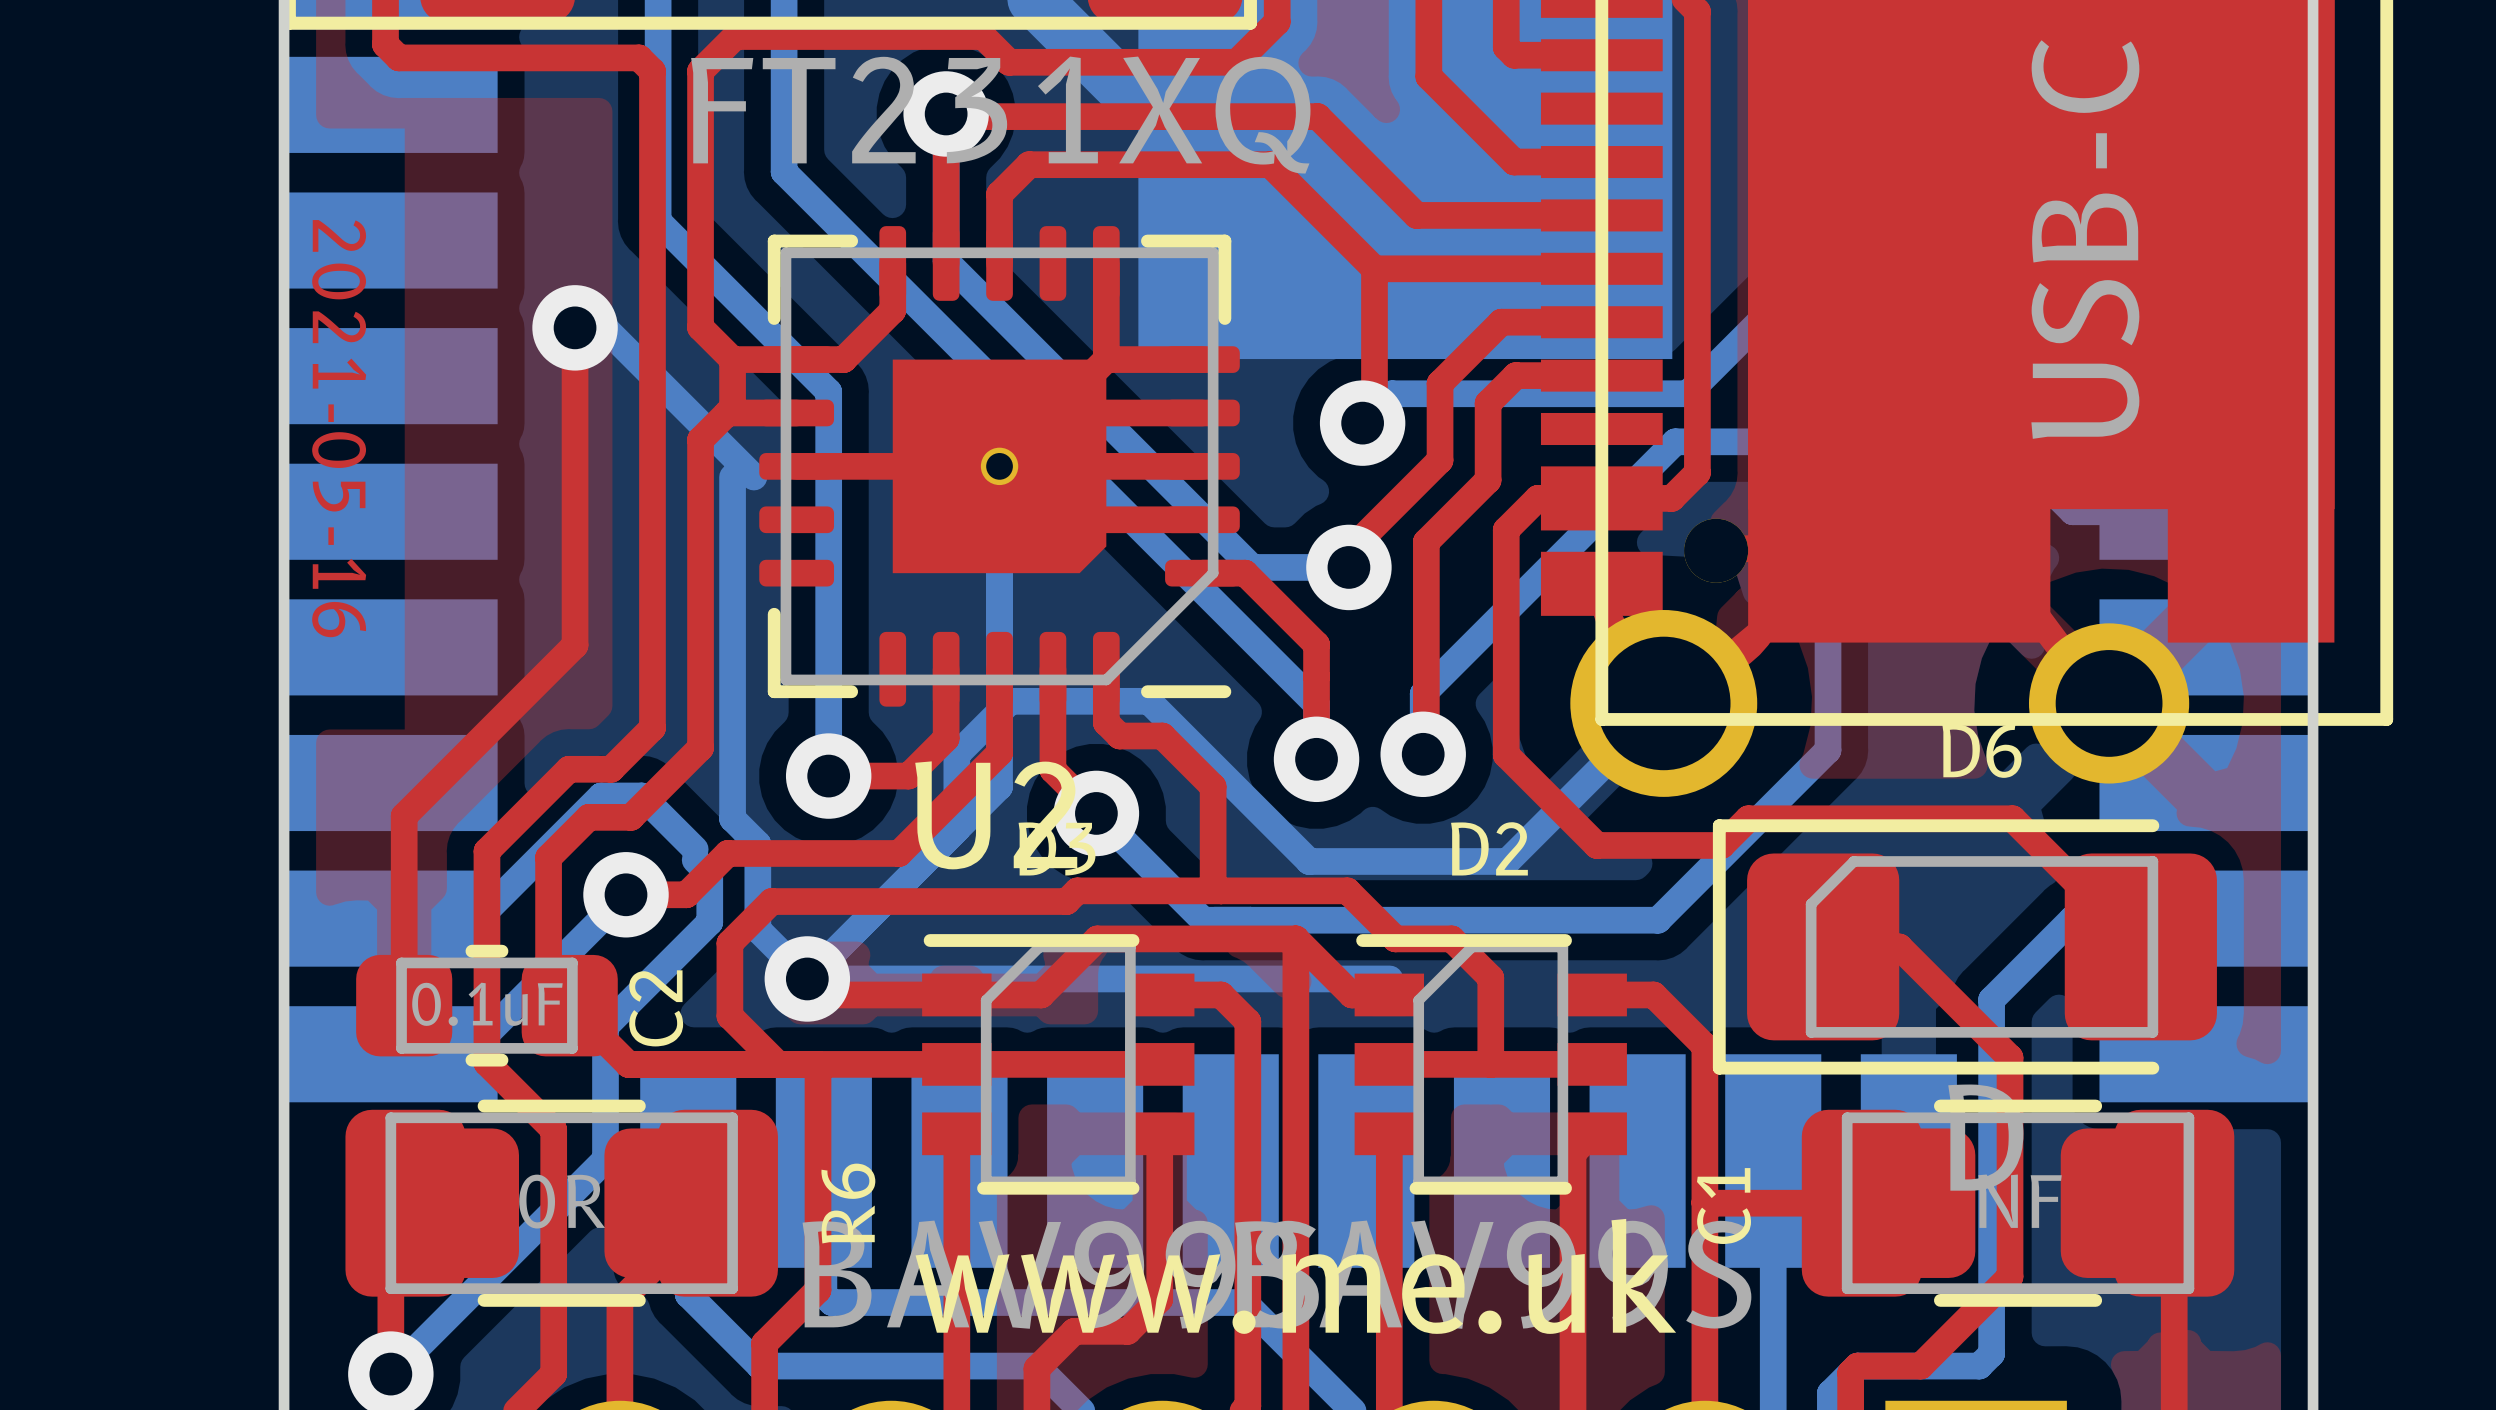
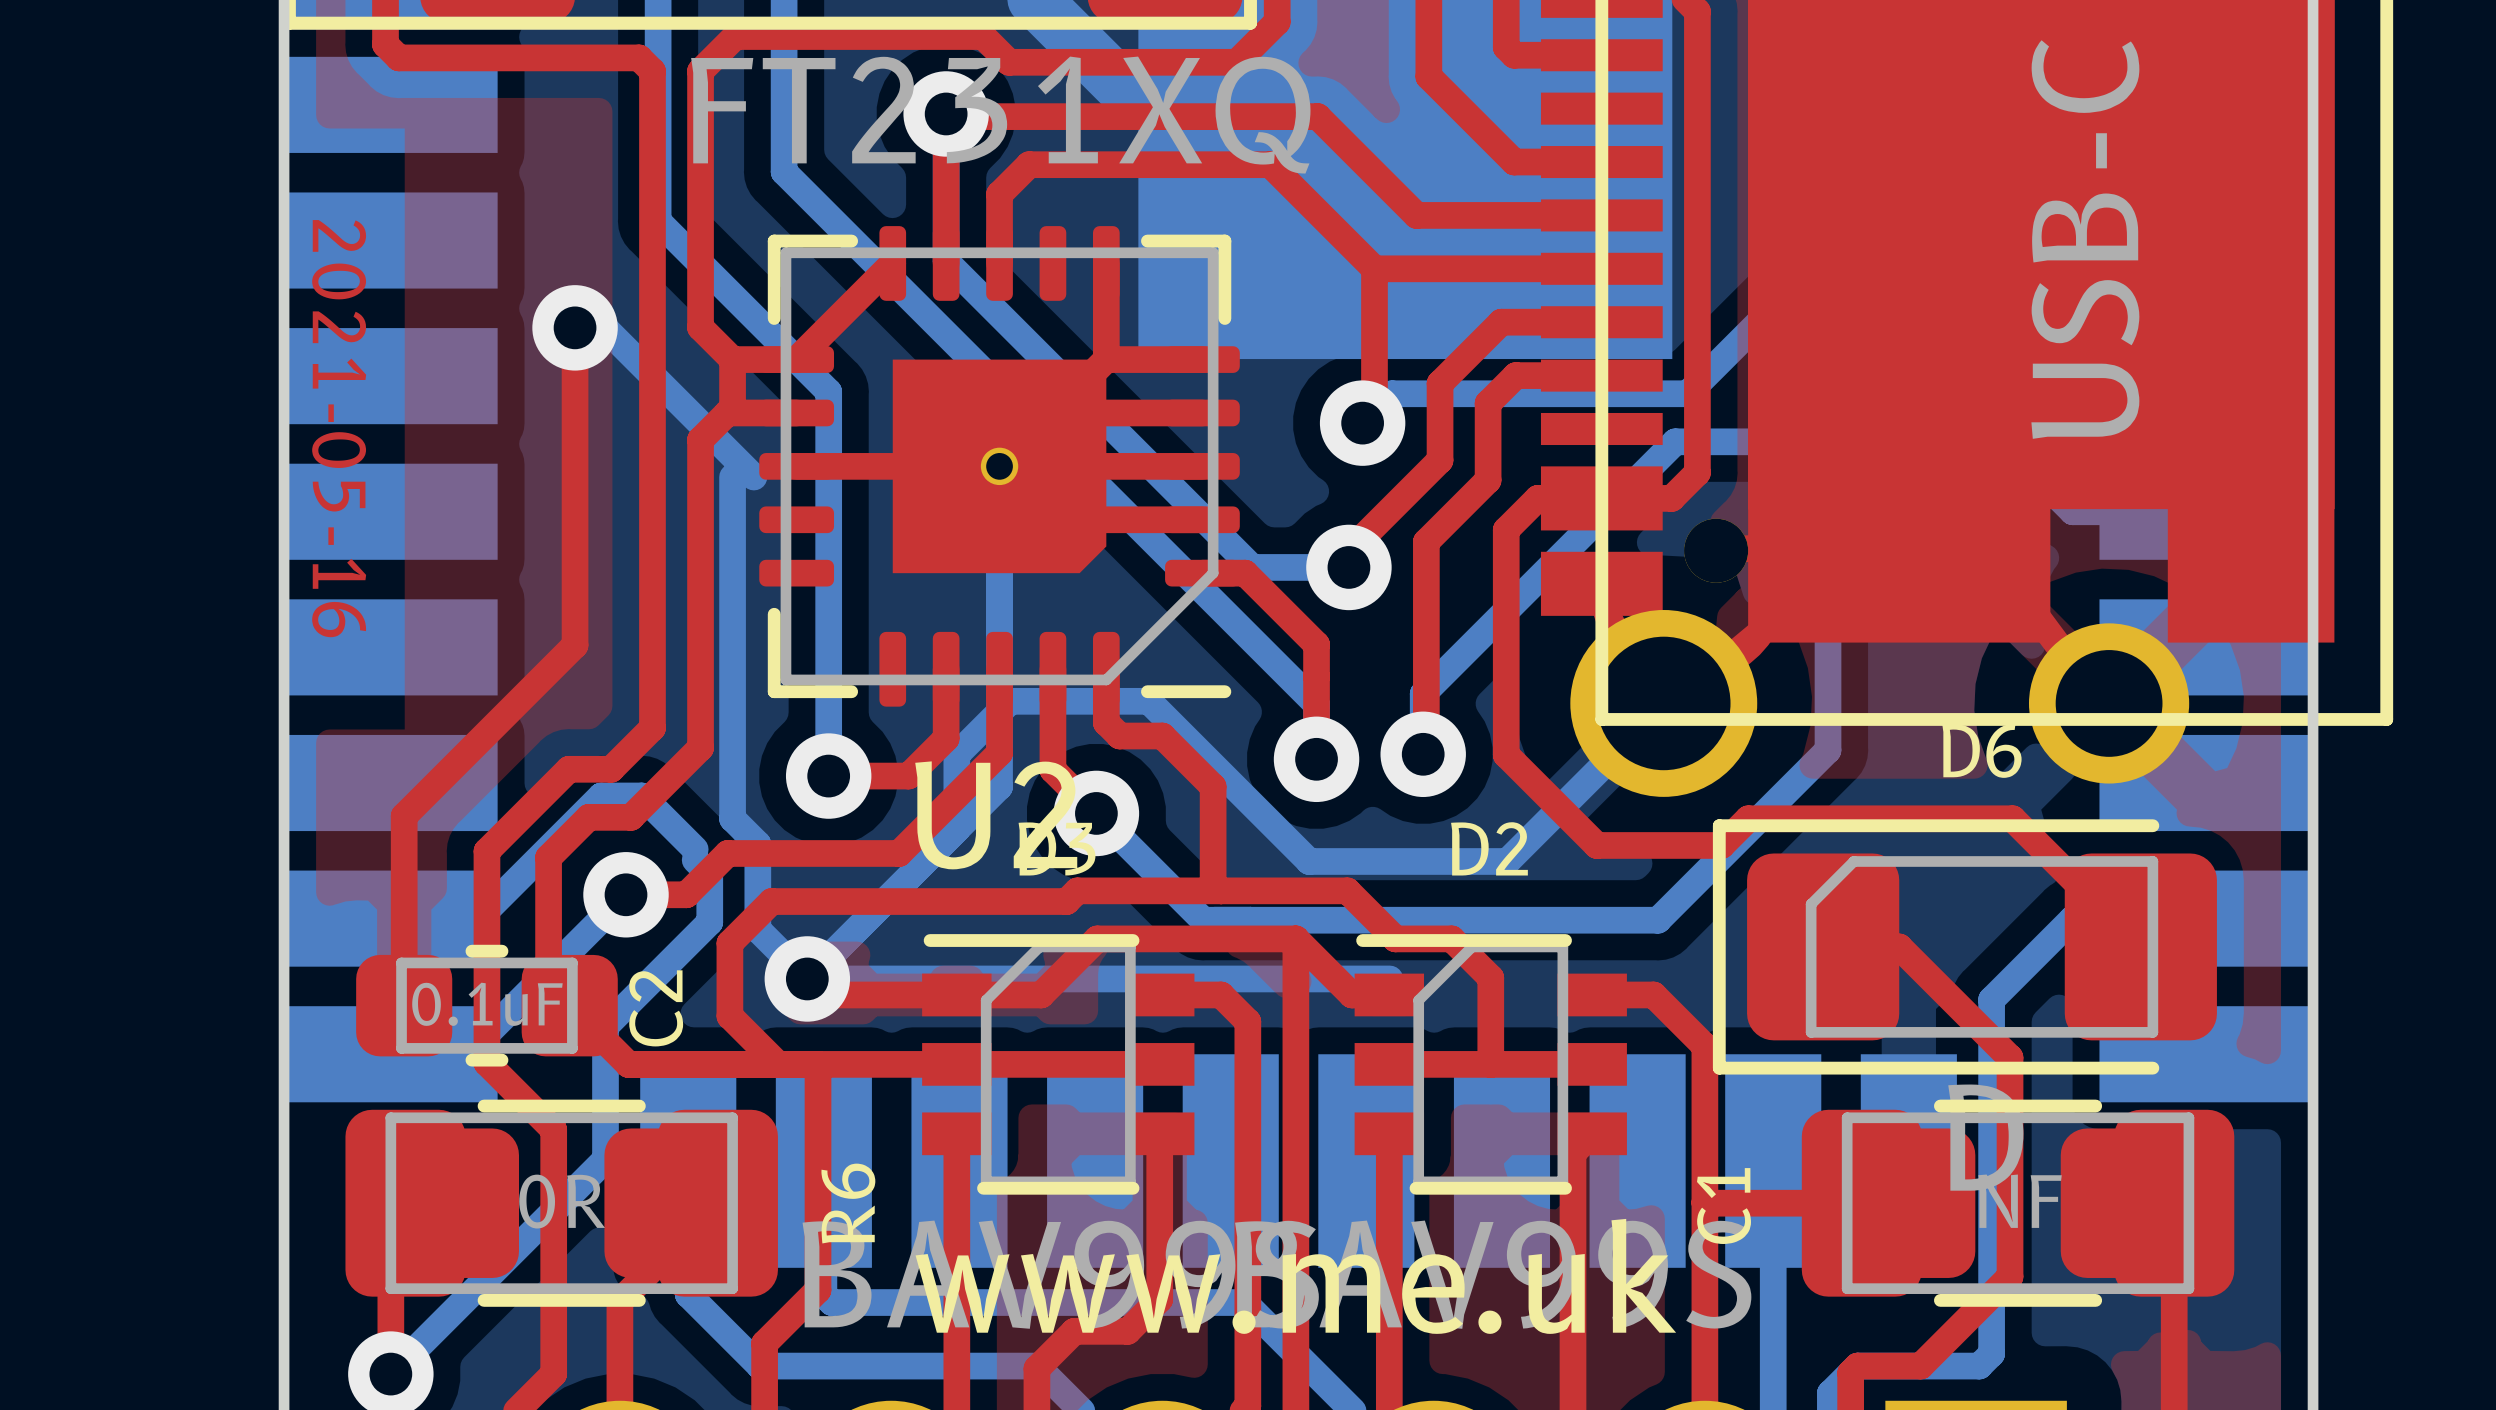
top track: (892, 263) (892, 310) (843, 359) (796, 359) -> (892, 263) (796, 359)

